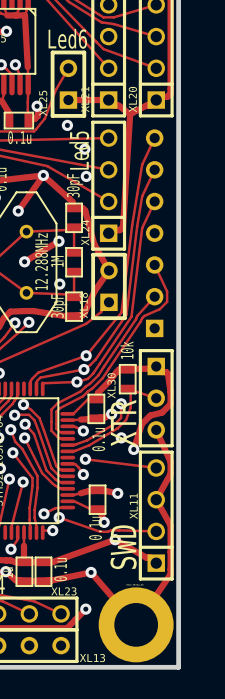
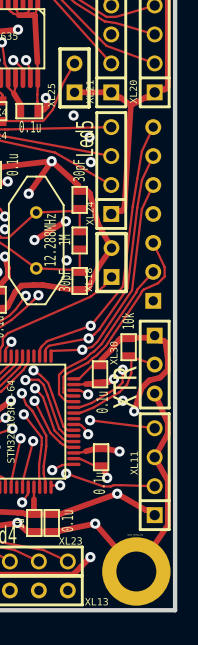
text: Led6 (67, 38) -> none
text: SWD (123, 547) -> none

